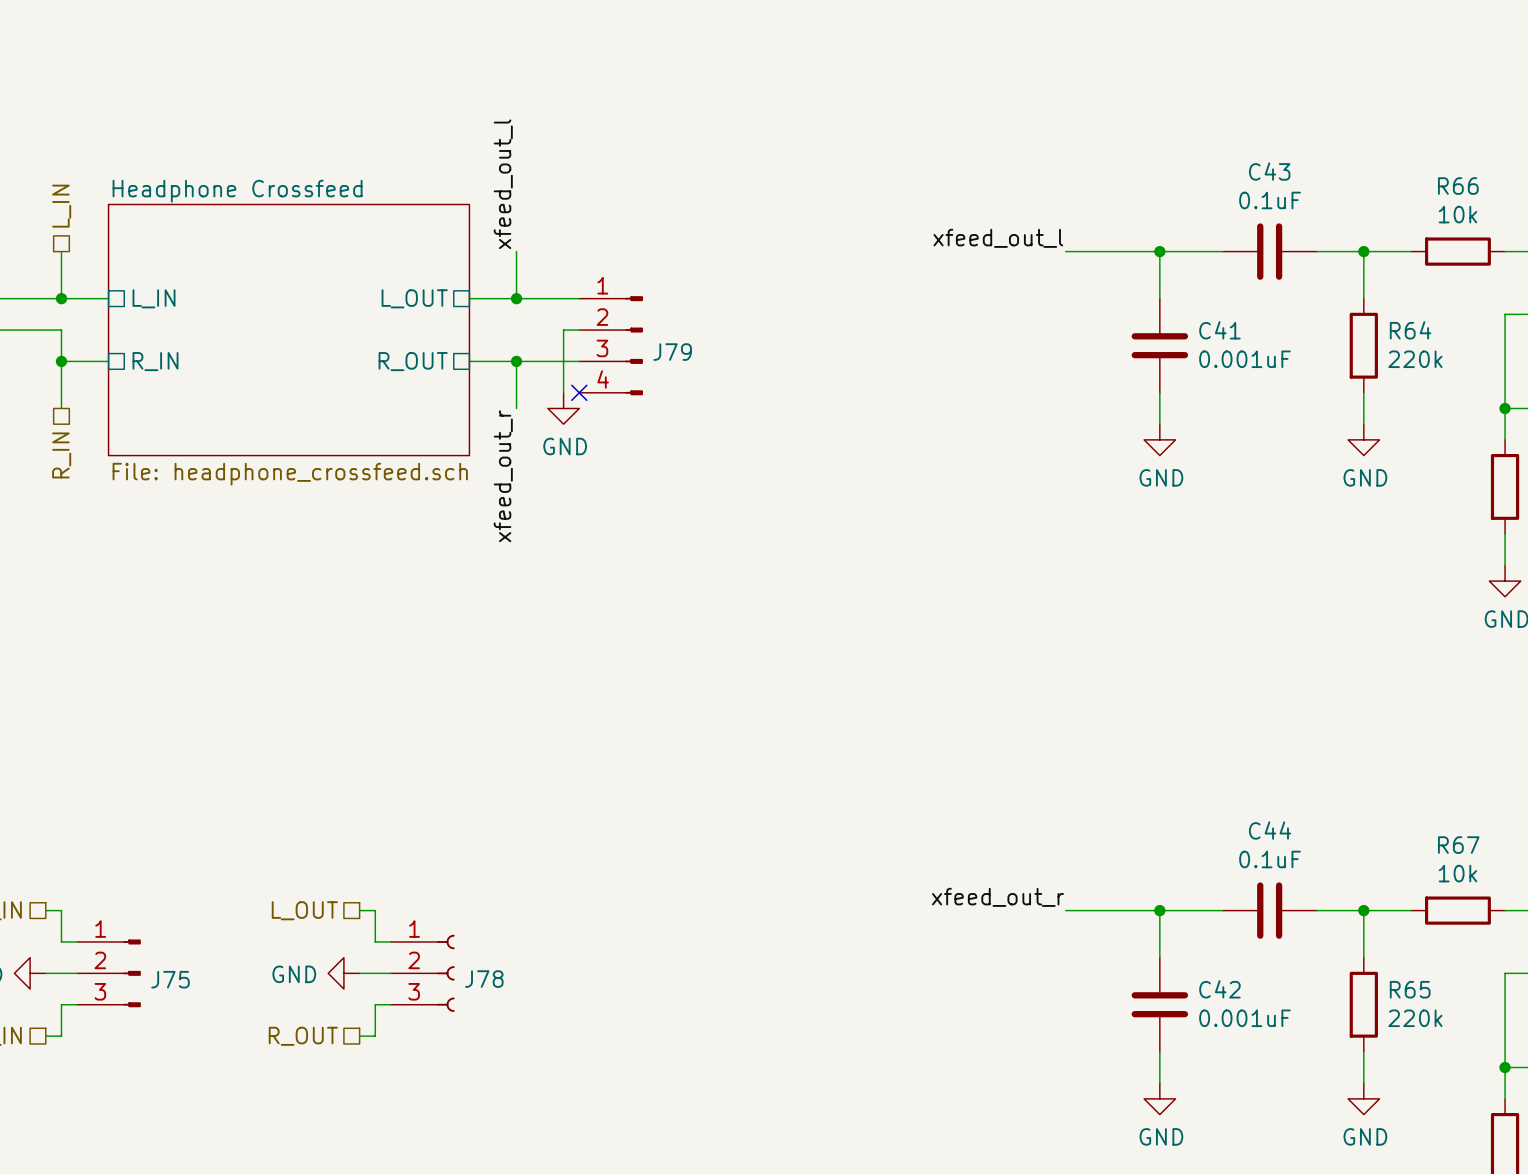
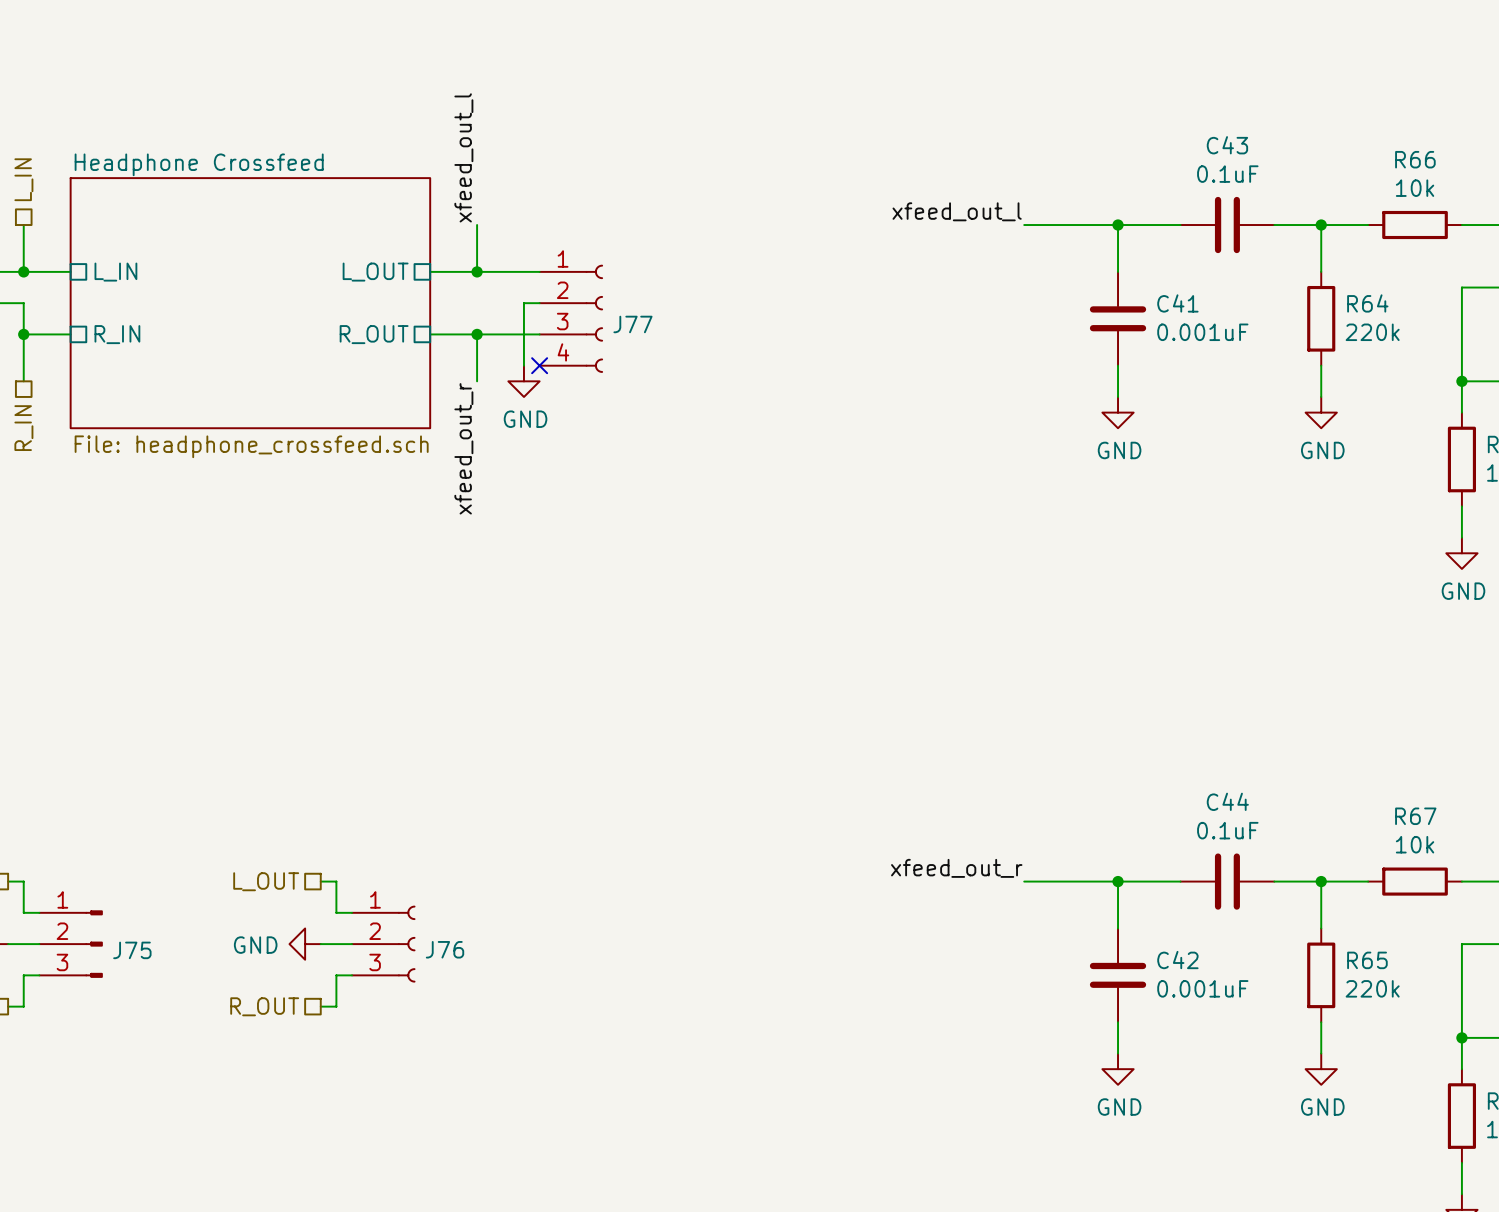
J79: (611, 345) -> none
J77: none -> (571, 318)
J78 name: J78 (484, 979) -> J76 (445, 949)

